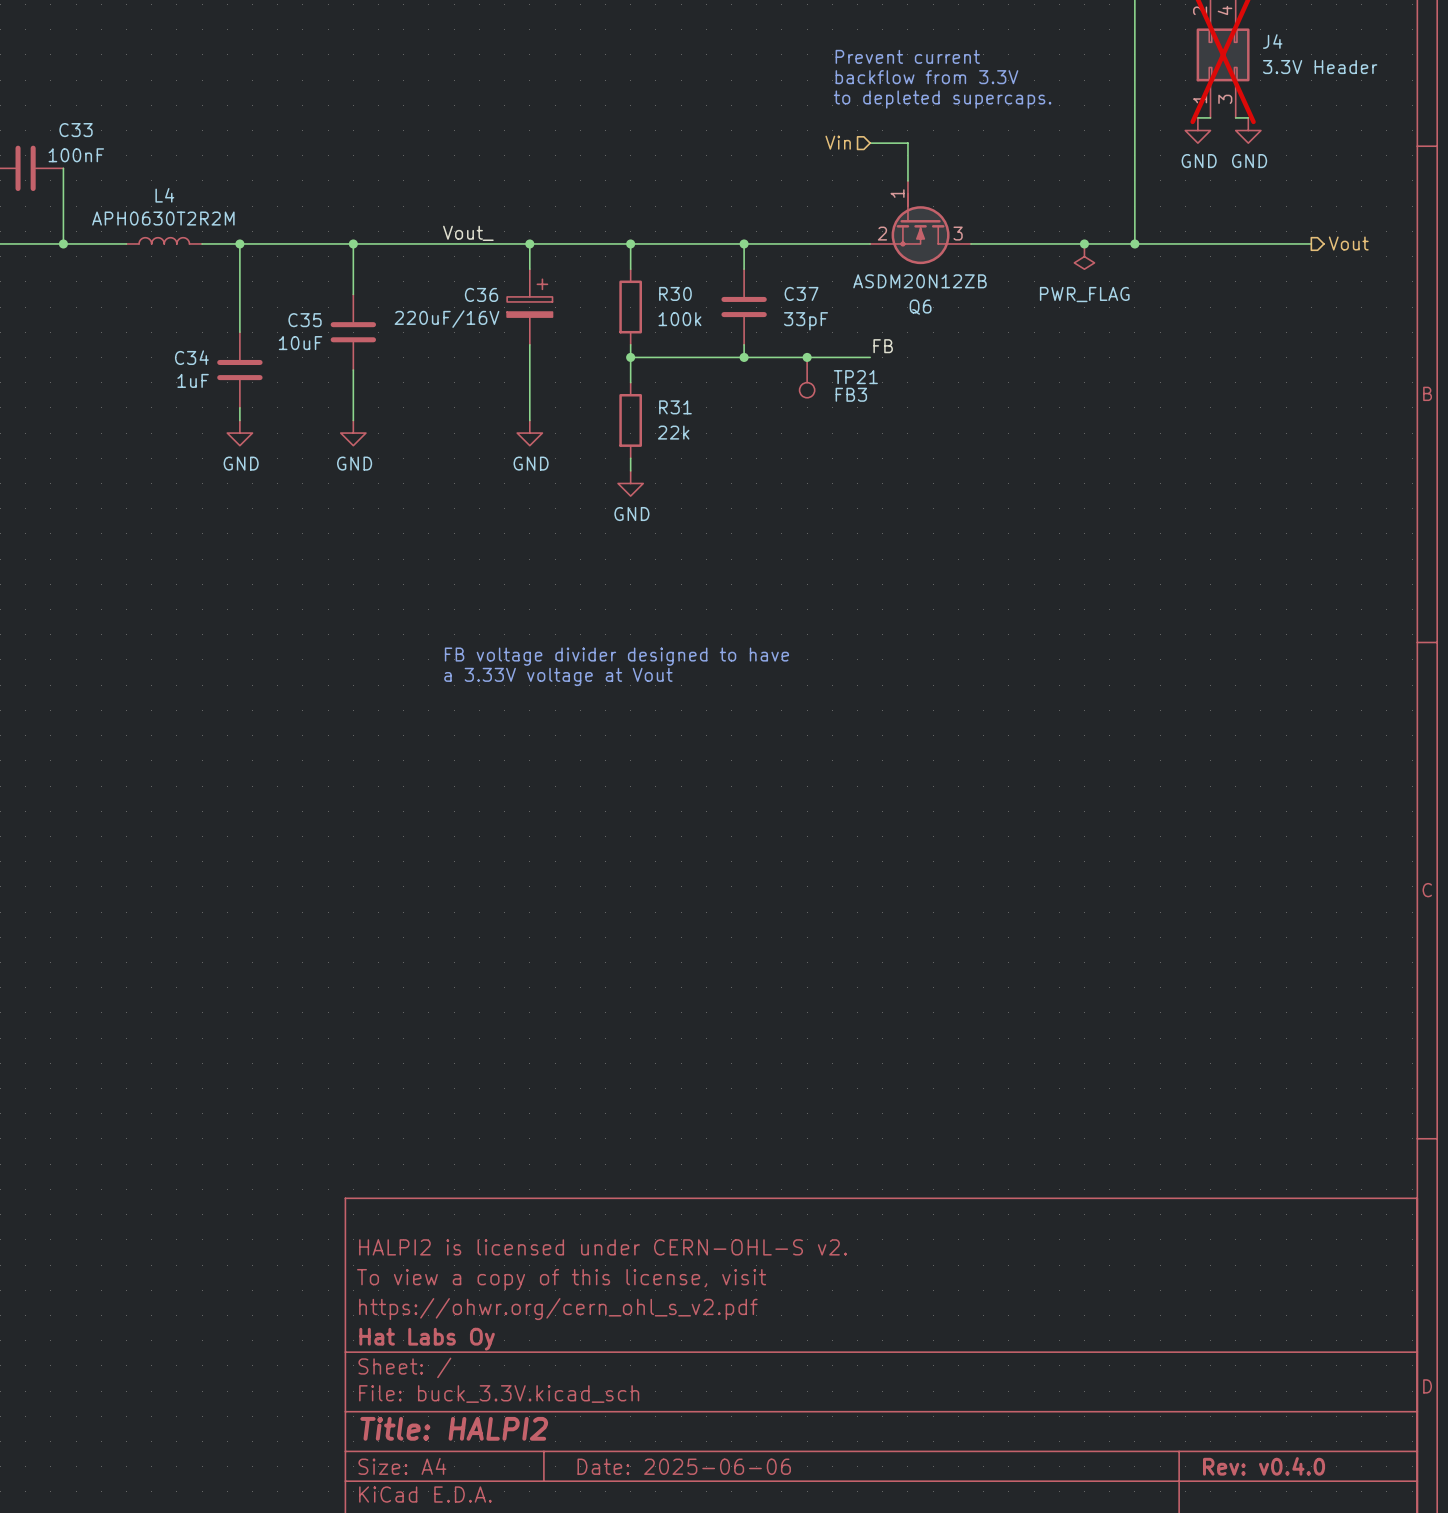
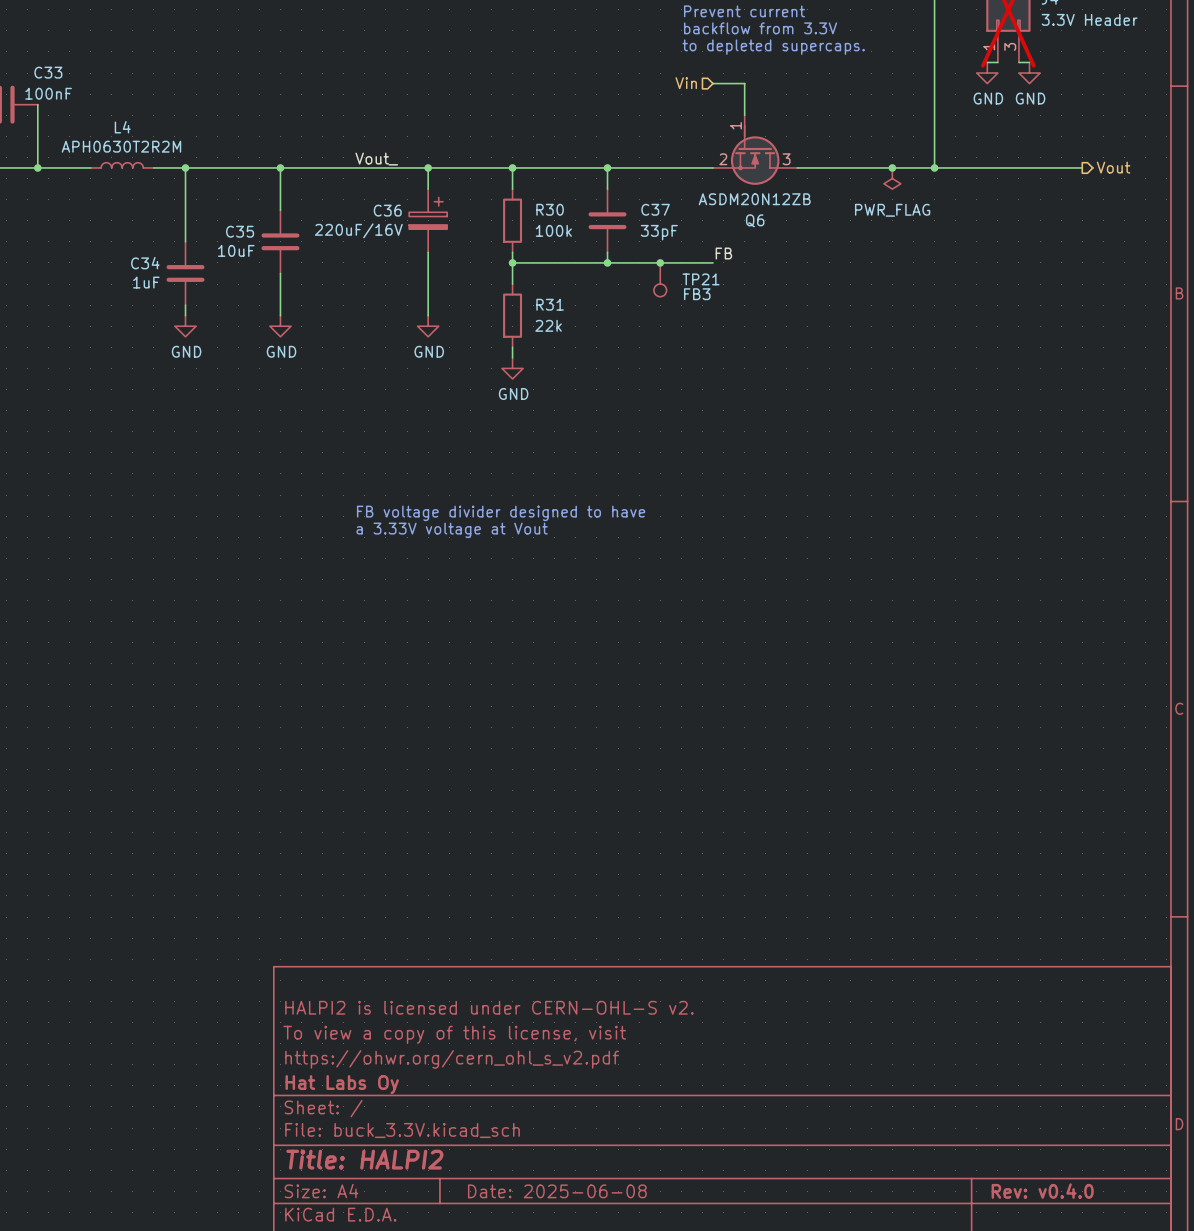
title block: Date: 2025-06-06 (684, 1466) -> Date: 2025-06-08 (557, 1191)

